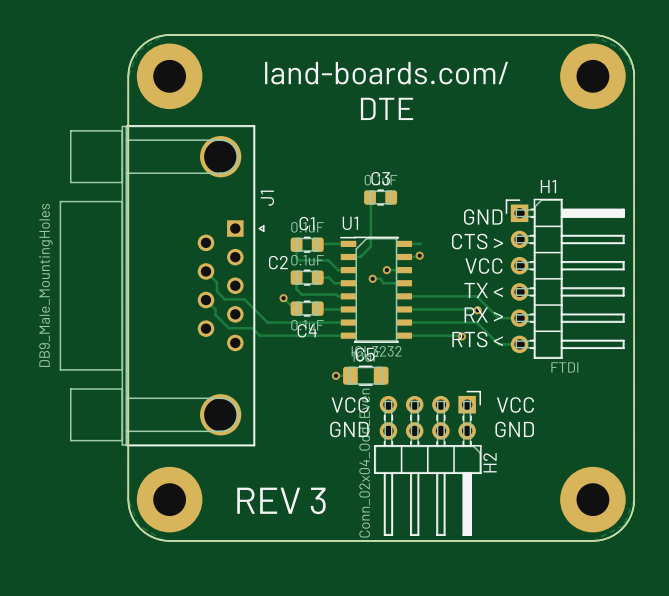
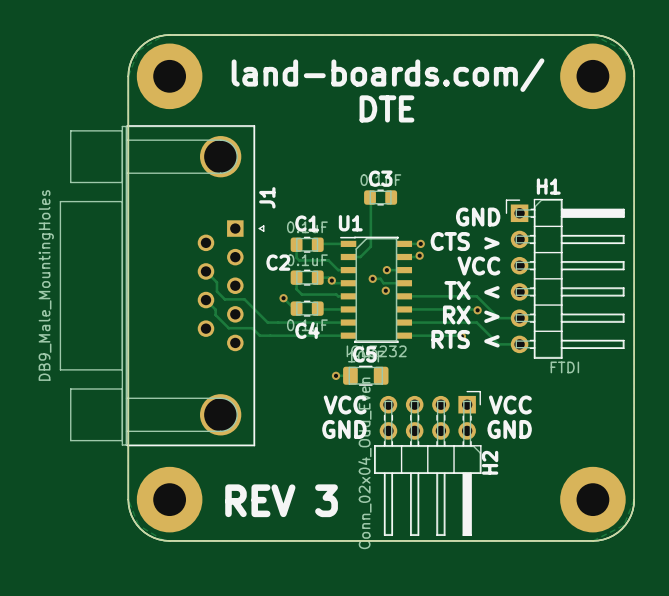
via: none -> (420, 243)
via: none -> (331, 280)
via: none -> (385, 290)

